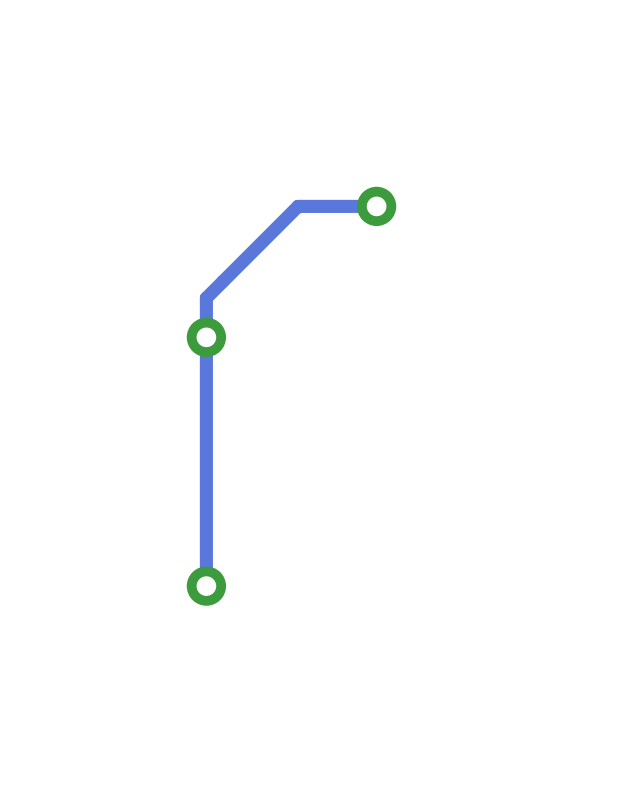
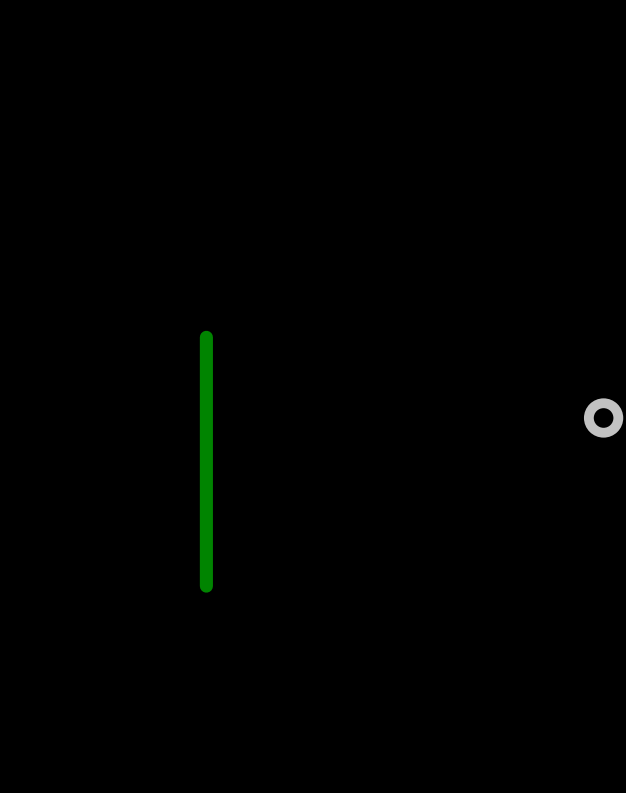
track: (376, 206) (298, 206) (206, 298) (206, 337) -> none
via: (376, 206) -> none
via: (206, 337) -> none
via: none -> (603, 417)
via: (206, 586) -> none

